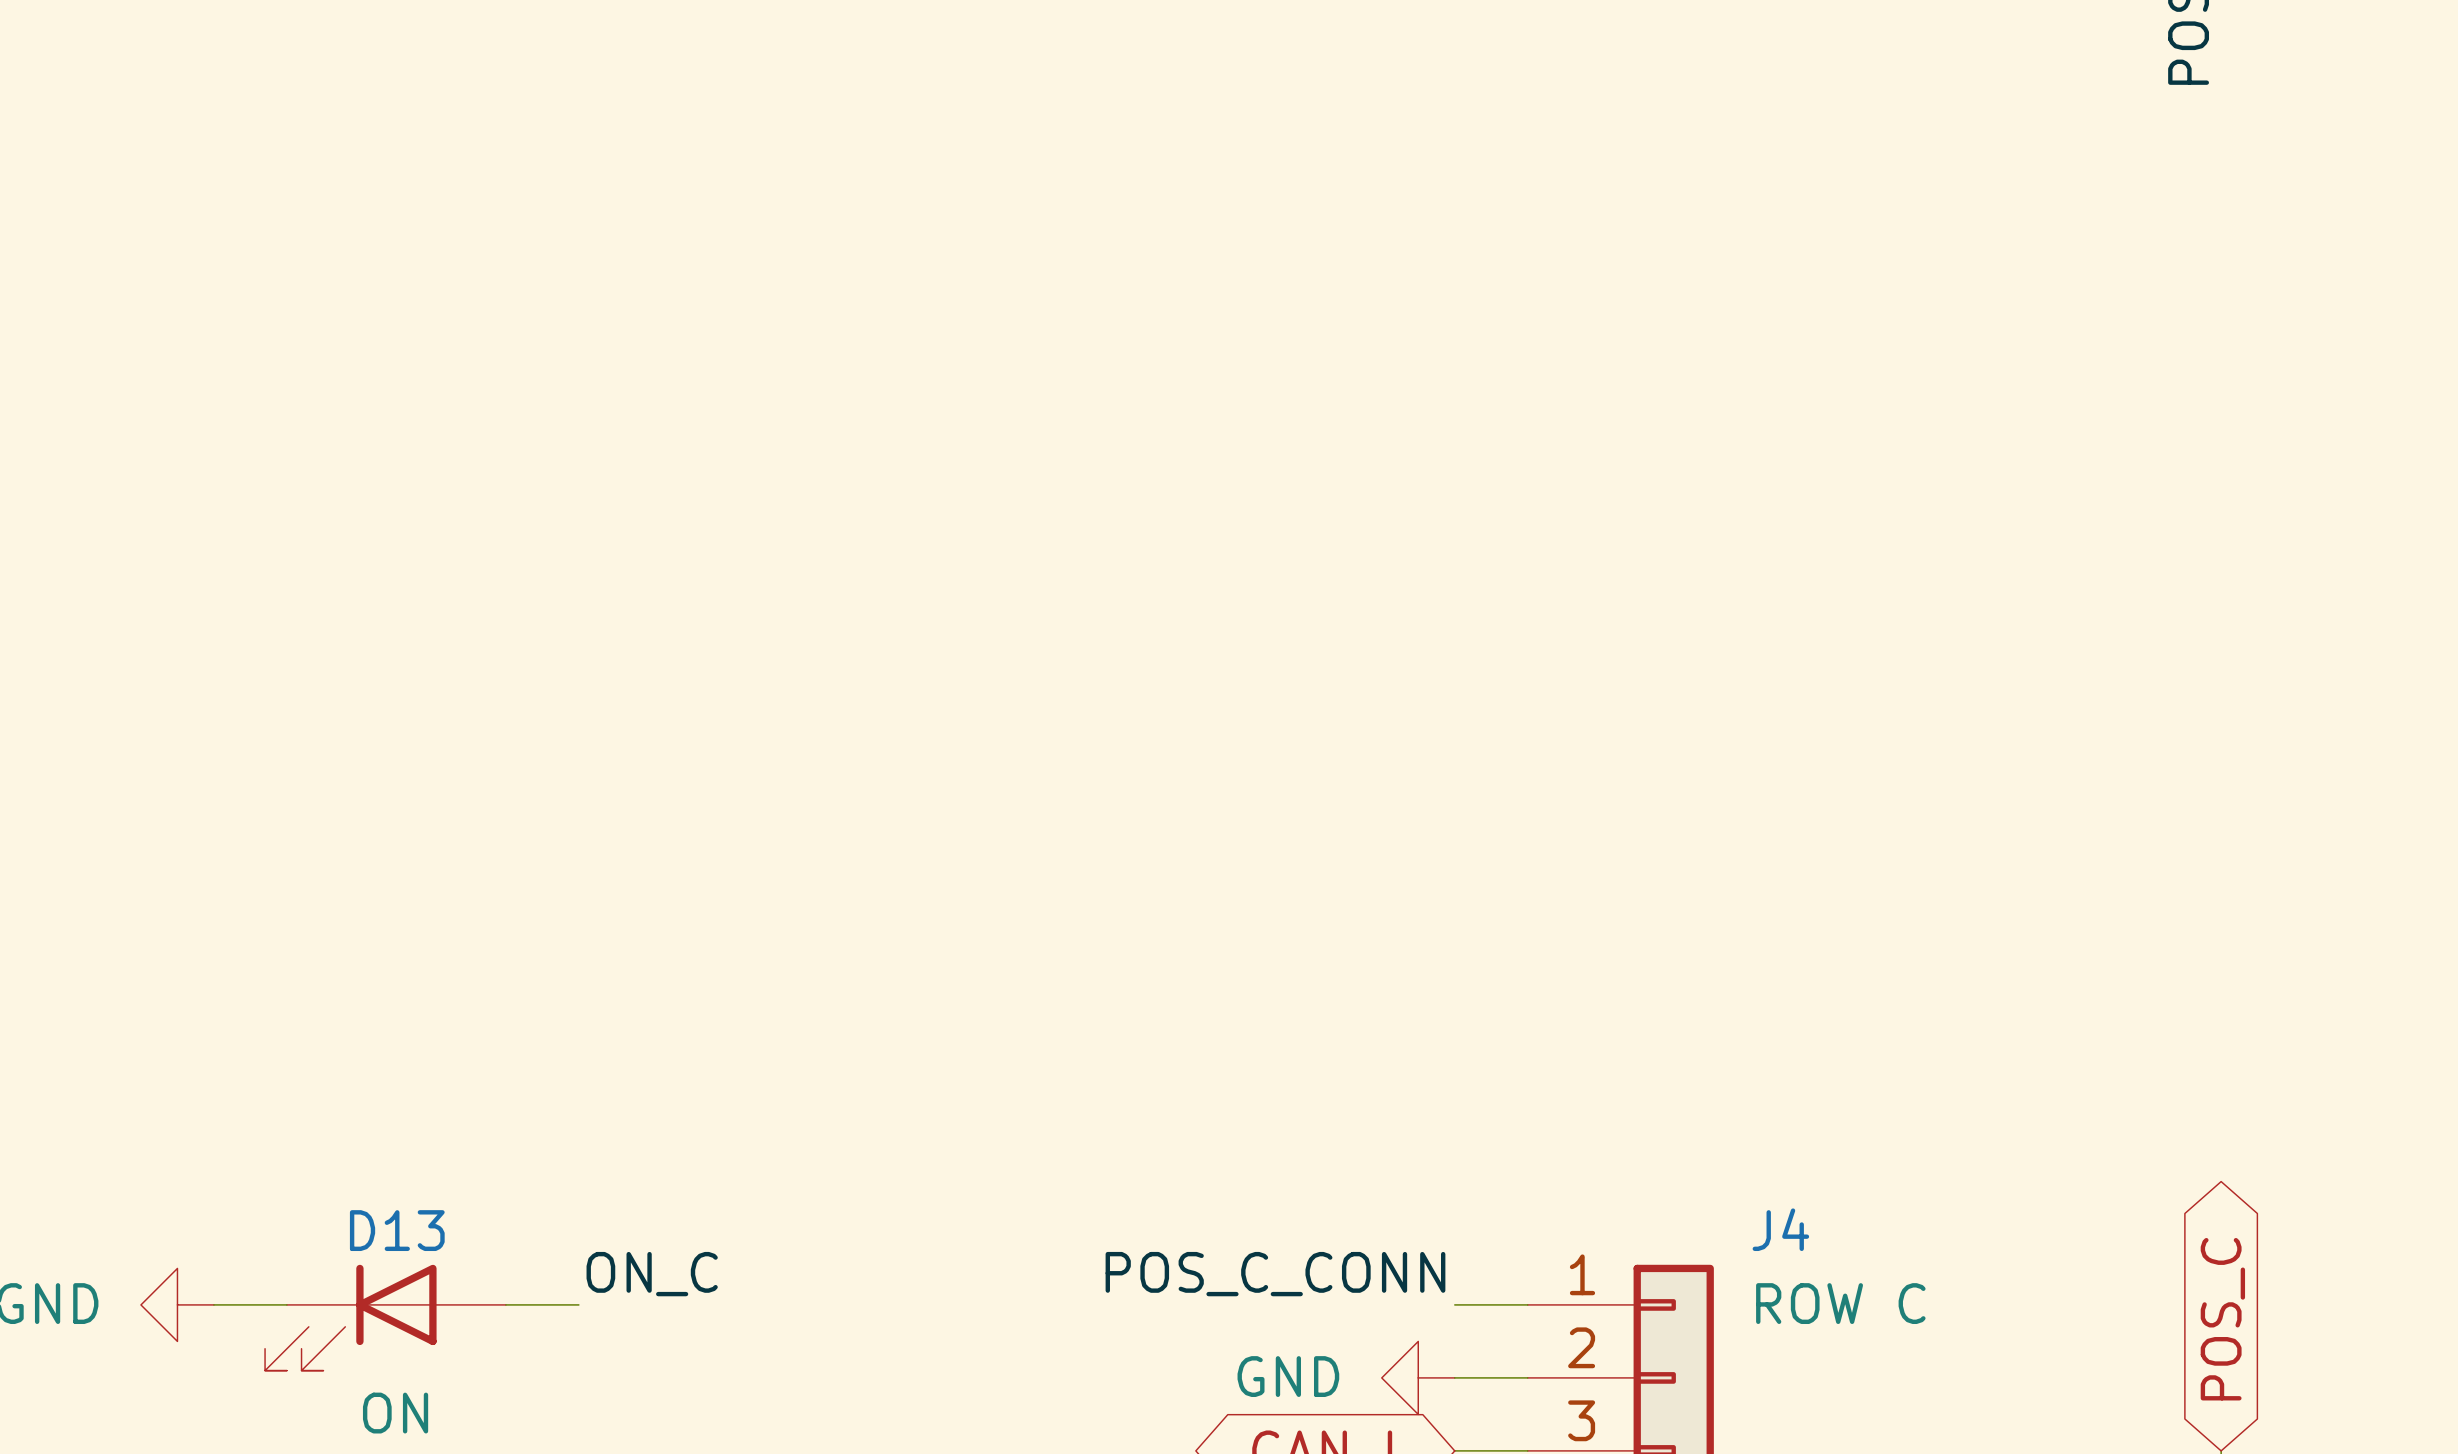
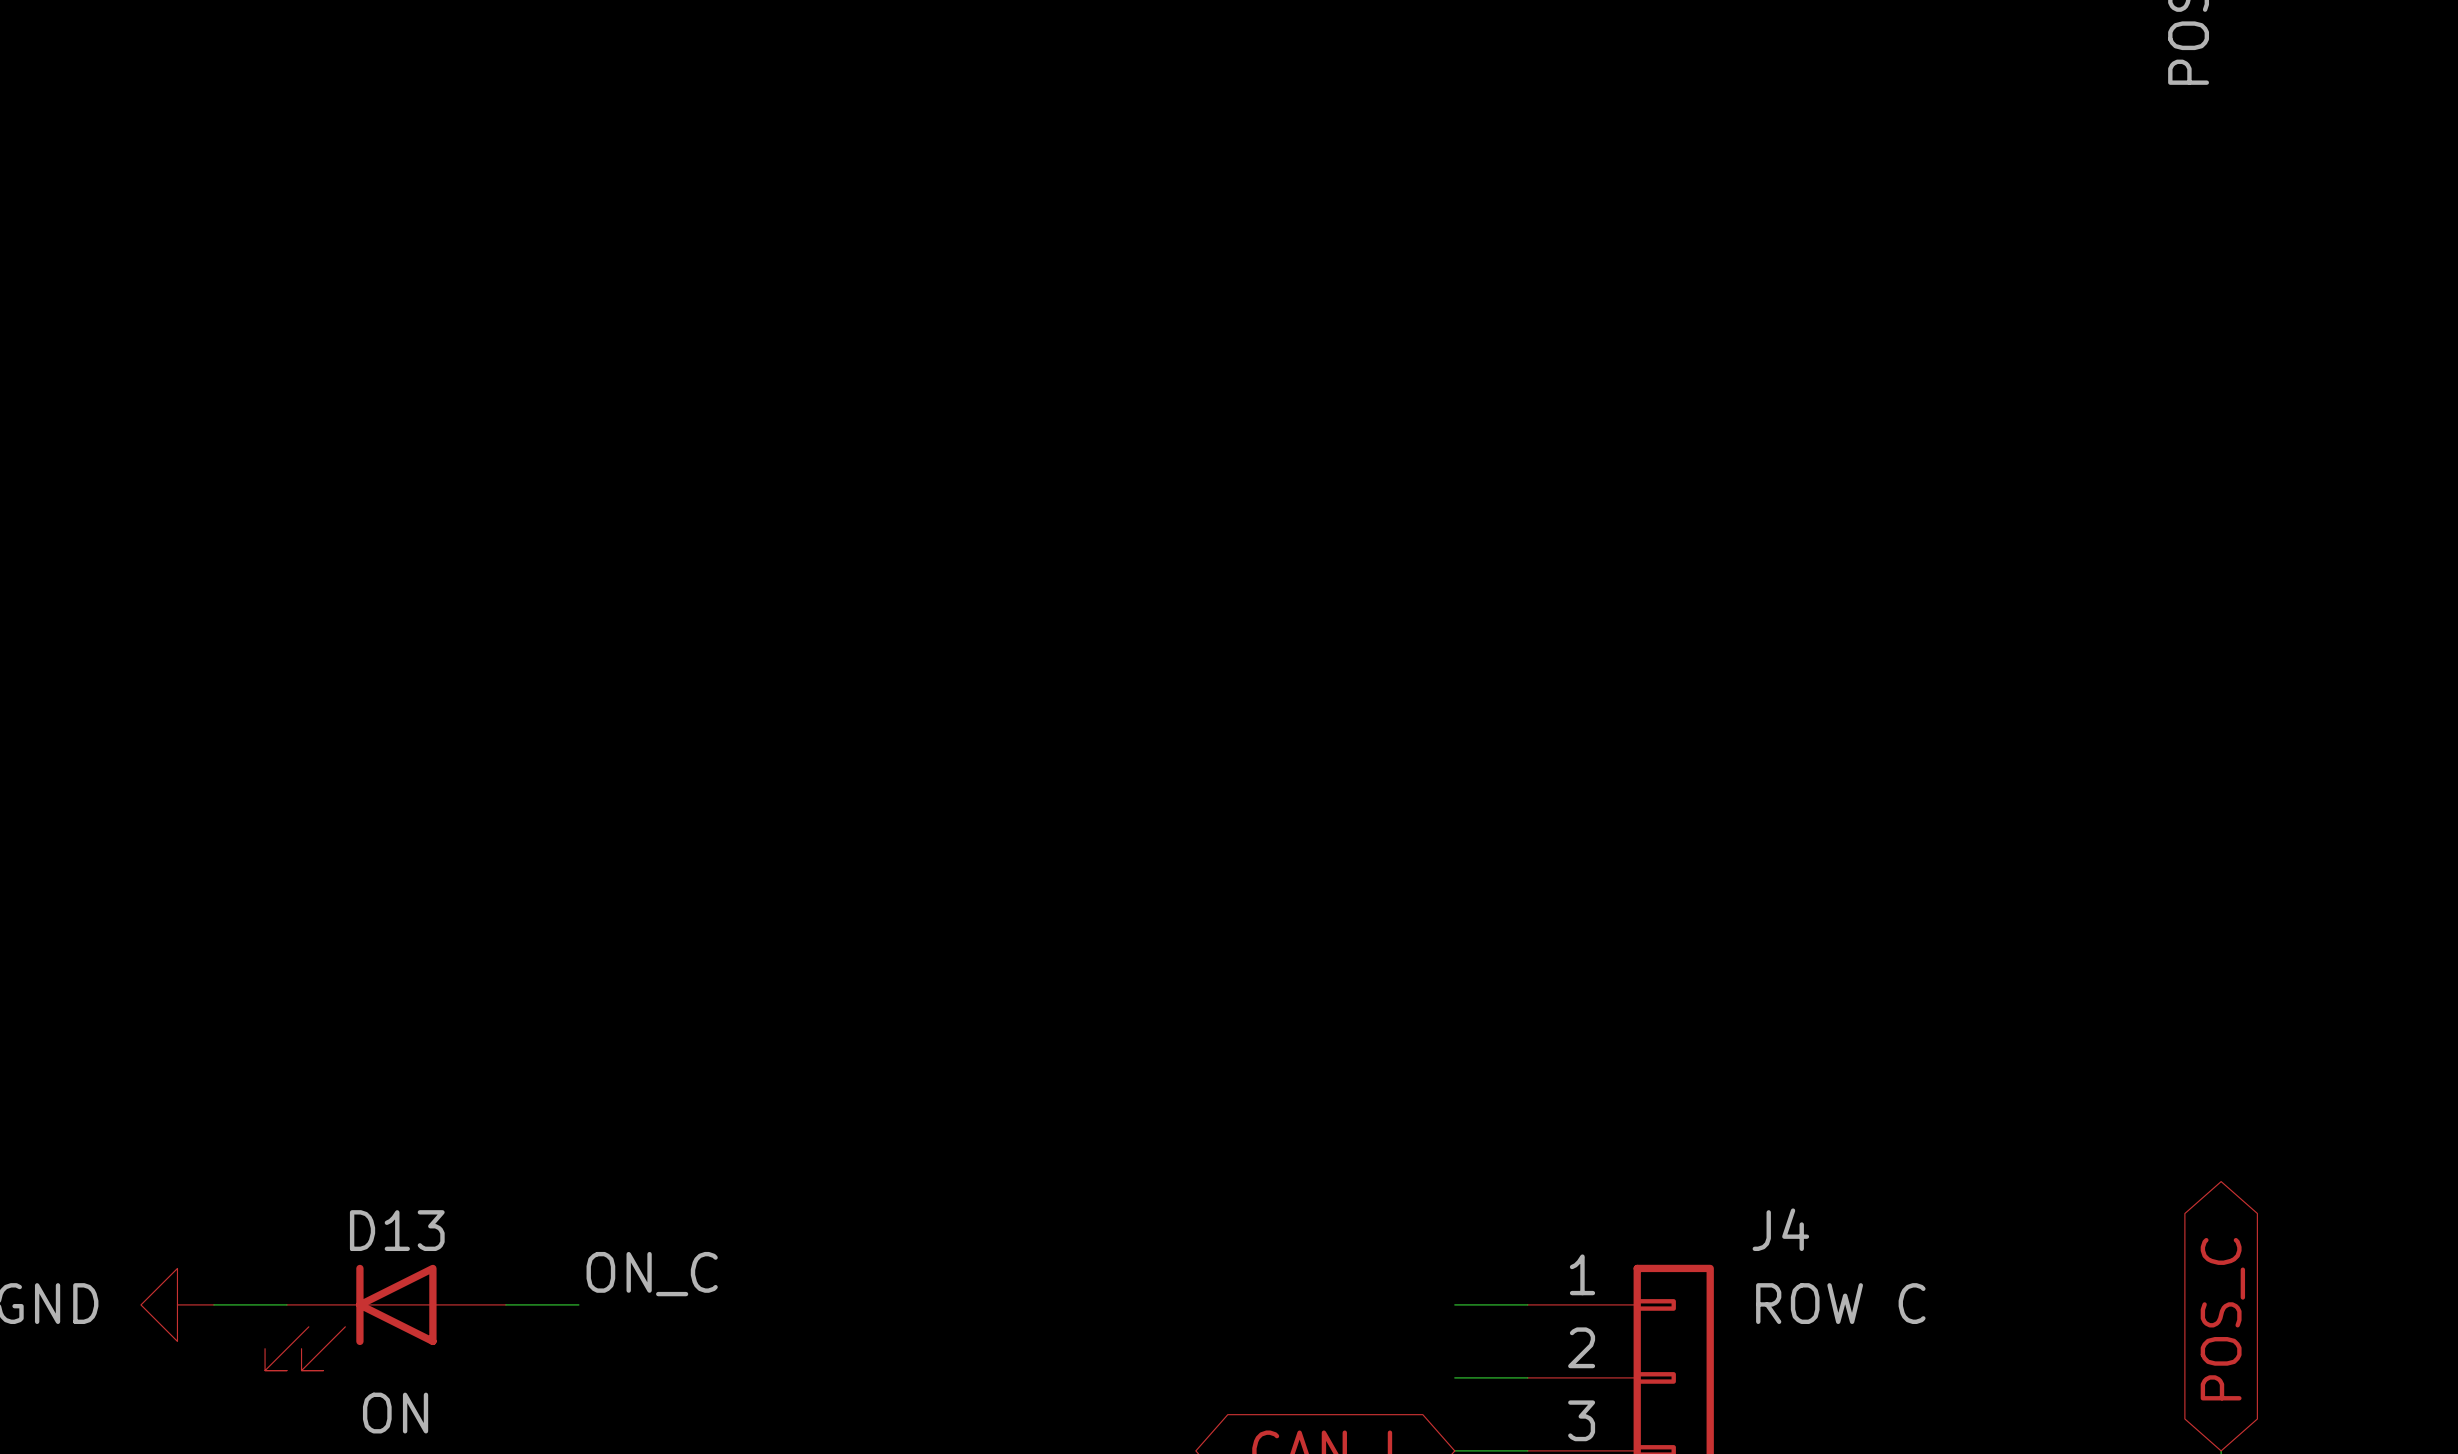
label: POS_C_CONN (1275, 1274) -> none
power symbol: GND (1418, 1377) -> none

